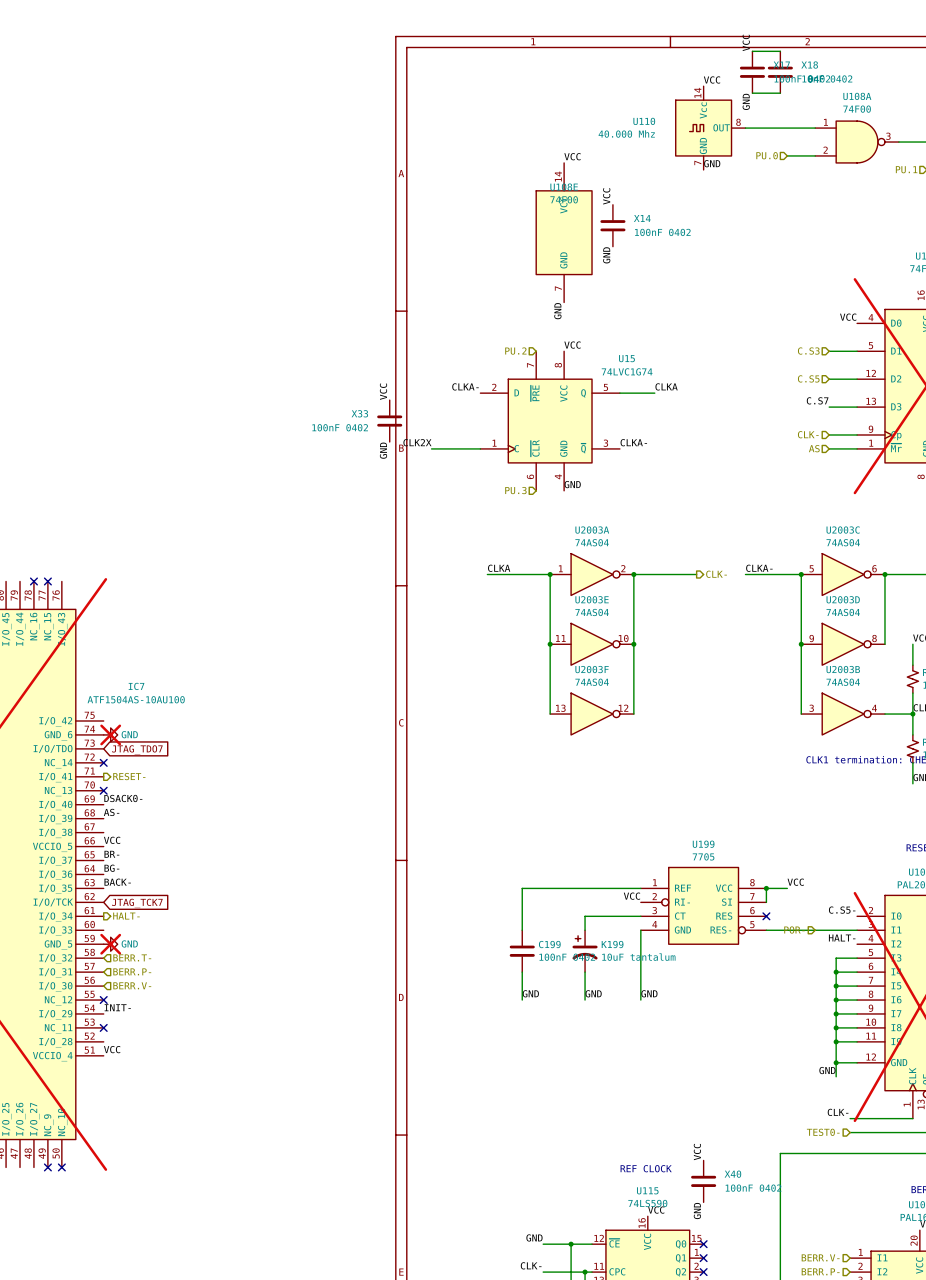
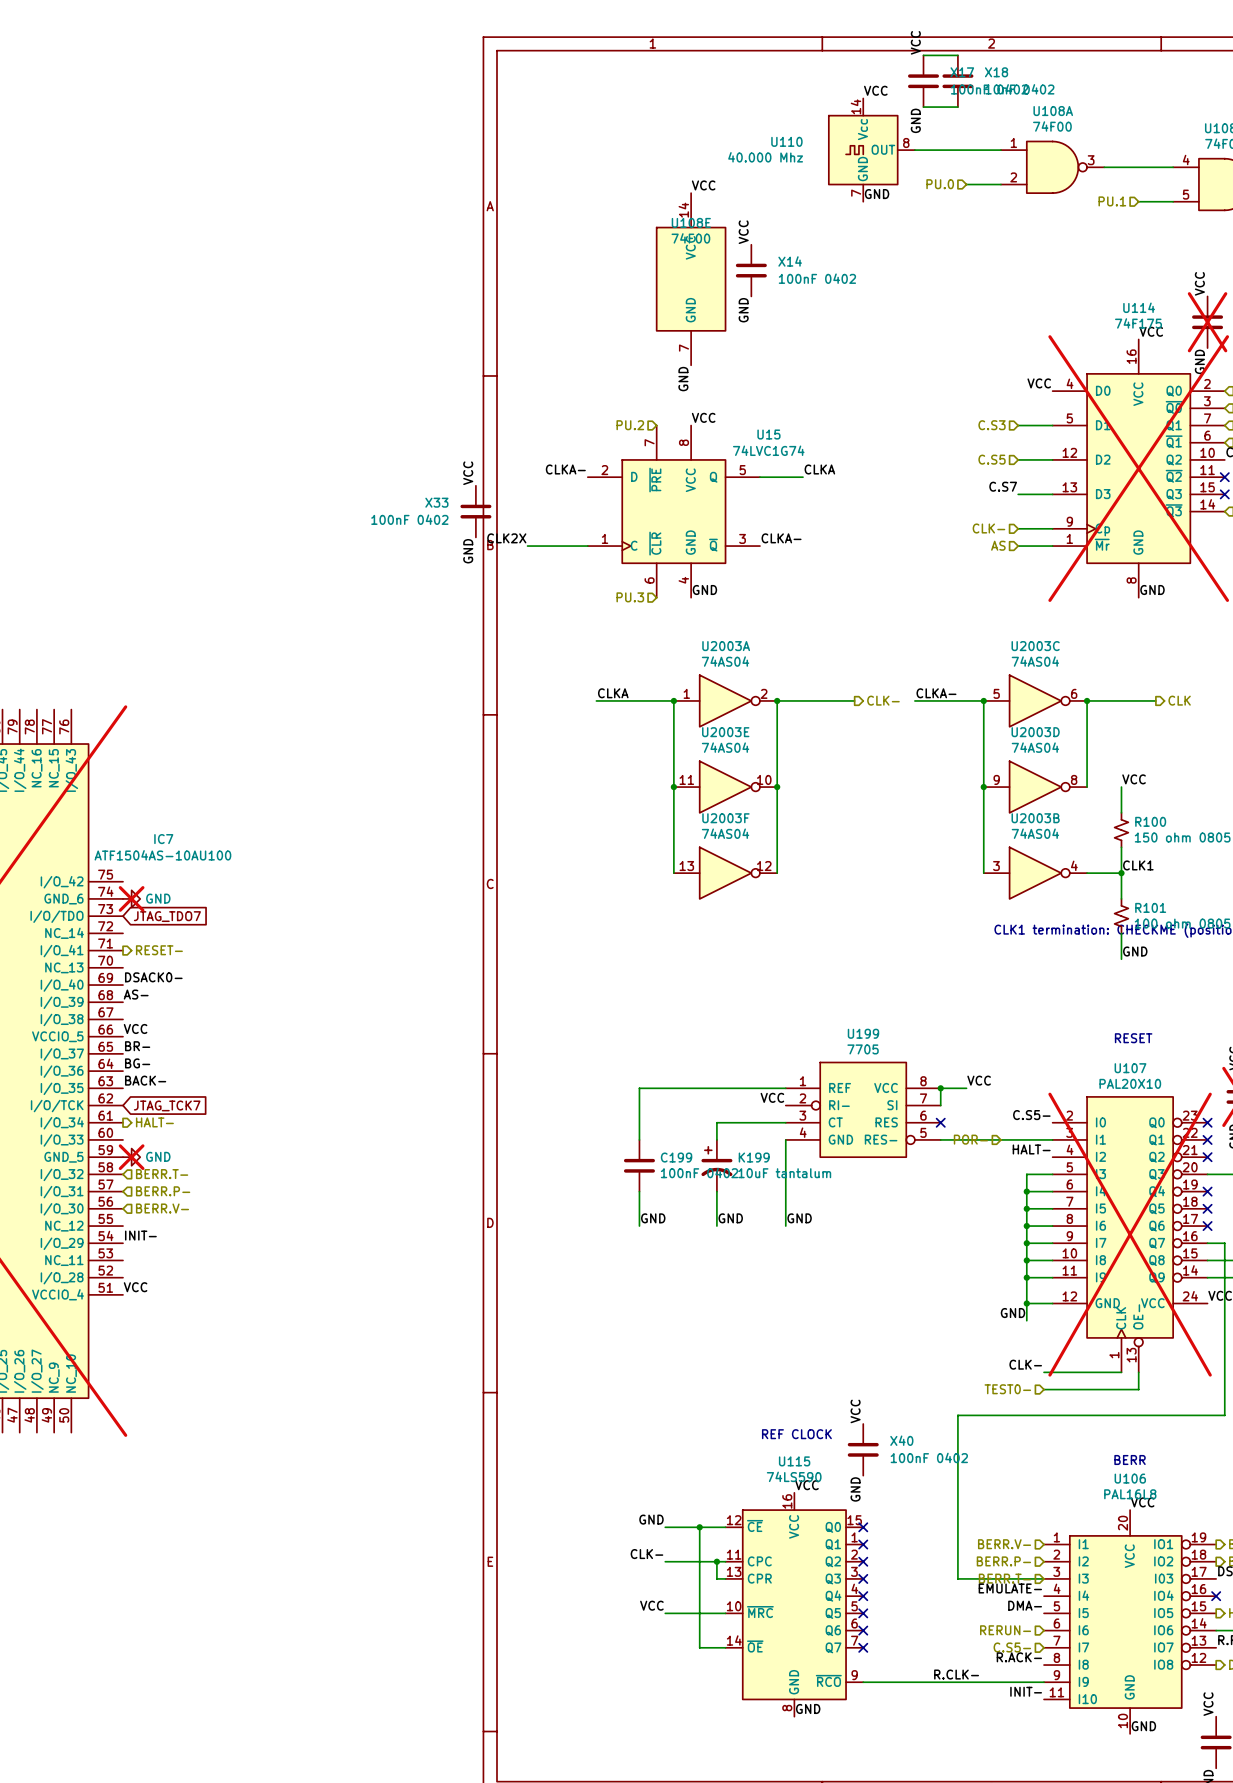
no-connect mark: (33, 581) -> none
no-connect mark: (47, 581) -> none
no-connect mark: (103, 762) -> none
no-connect mark: (103, 790) -> none
no-connect mark: (103, 1000) -> none
no-connect mark: (103, 1027) -> none
no-connect mark: (47, 1167) -> none
no-connect mark: (61, 1167) -> none

